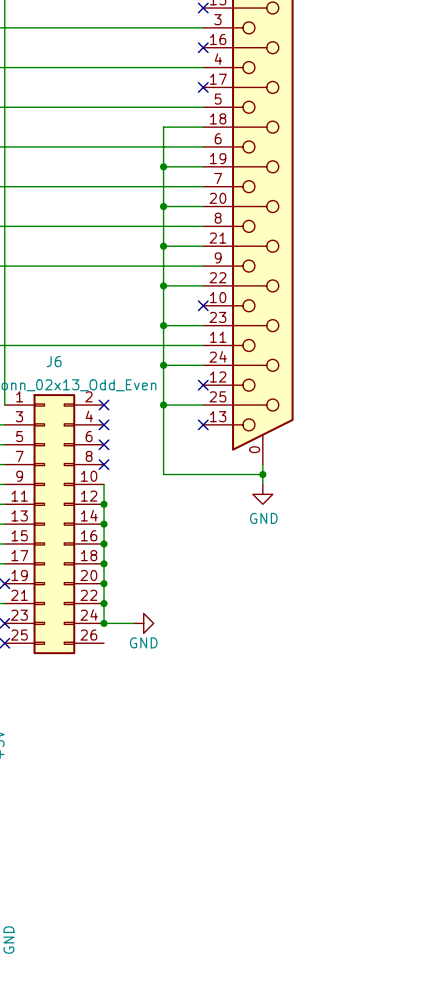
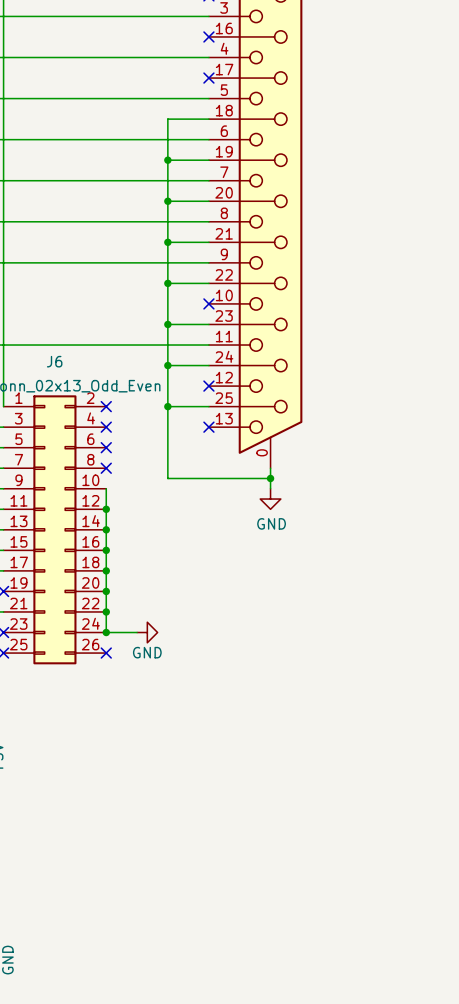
no-connect mark: none -> (106, 653)

